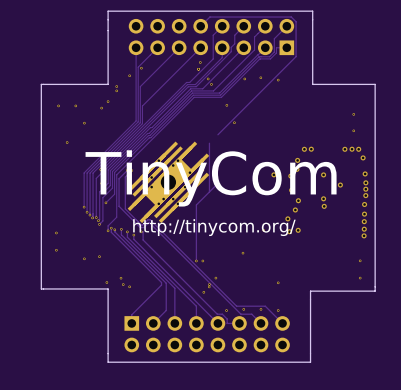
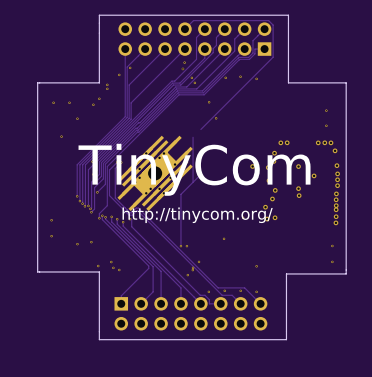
via: none -> (336, 199)
via: (364, 214) -> none
via: none -> (336, 205)

